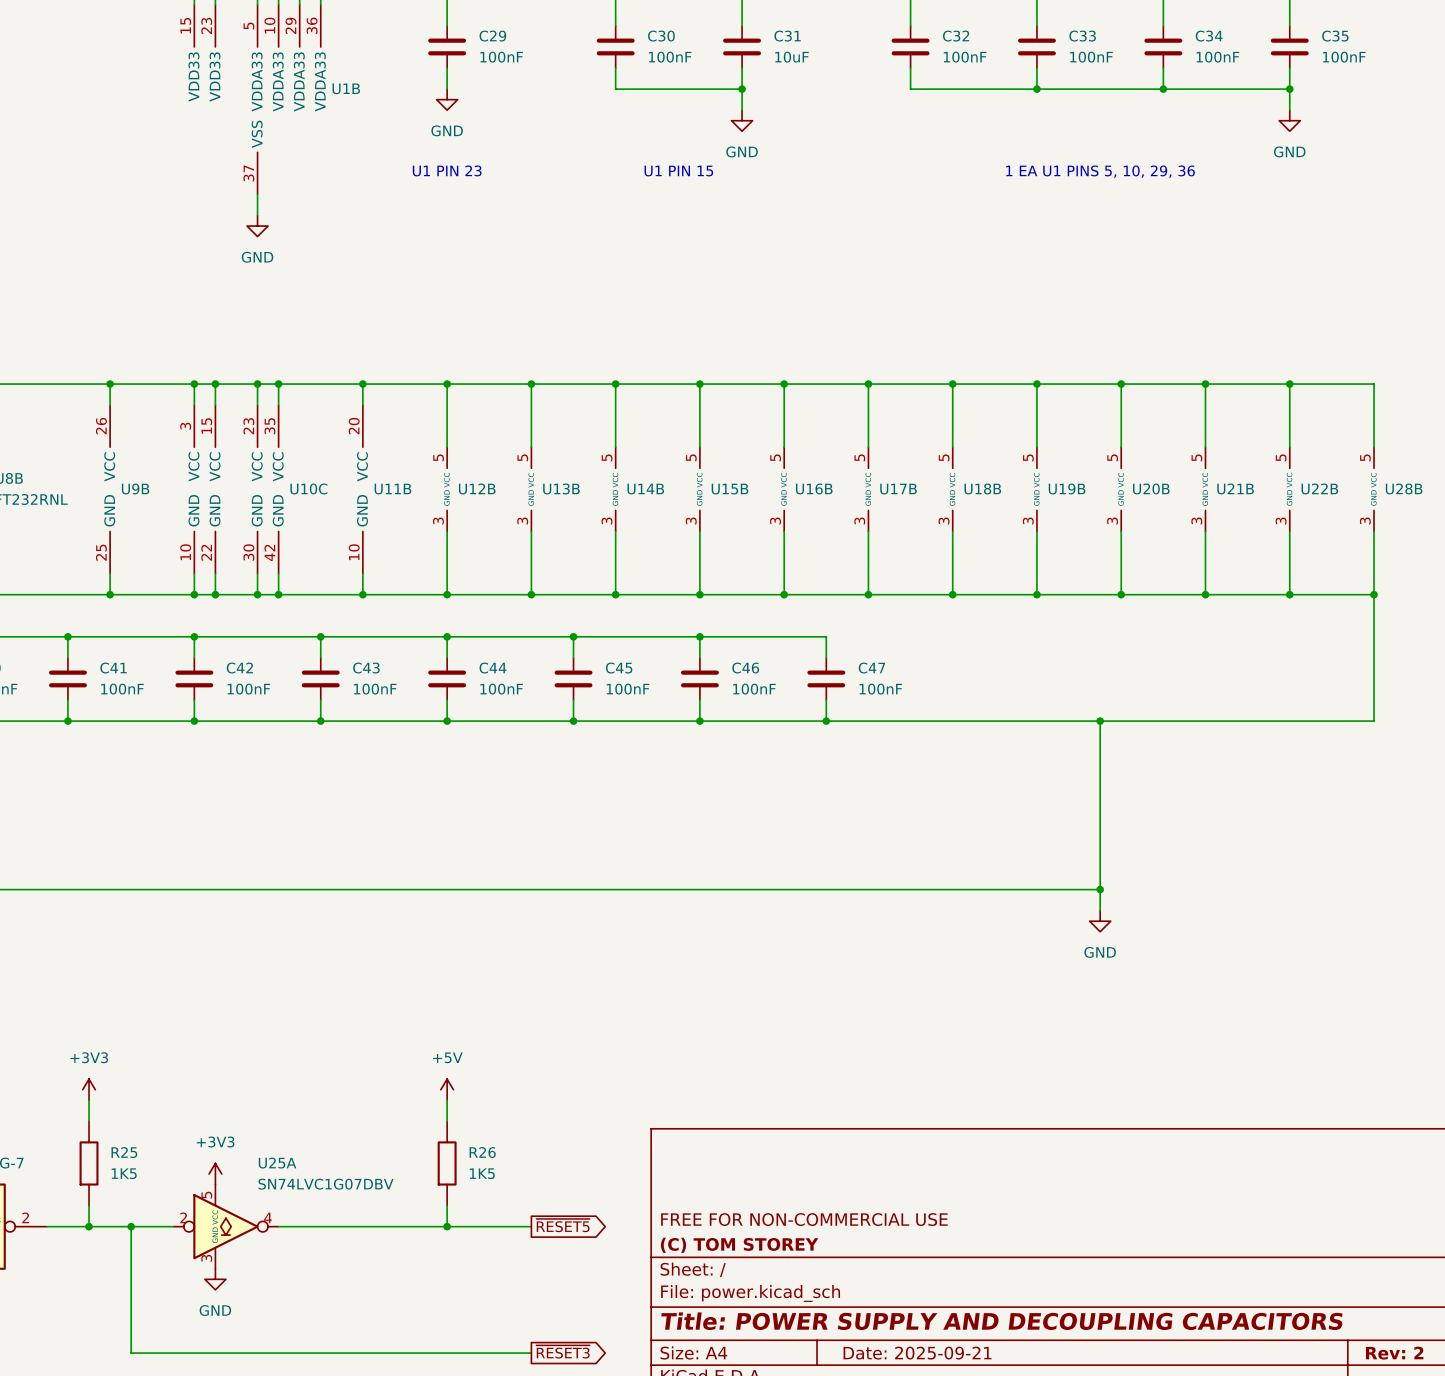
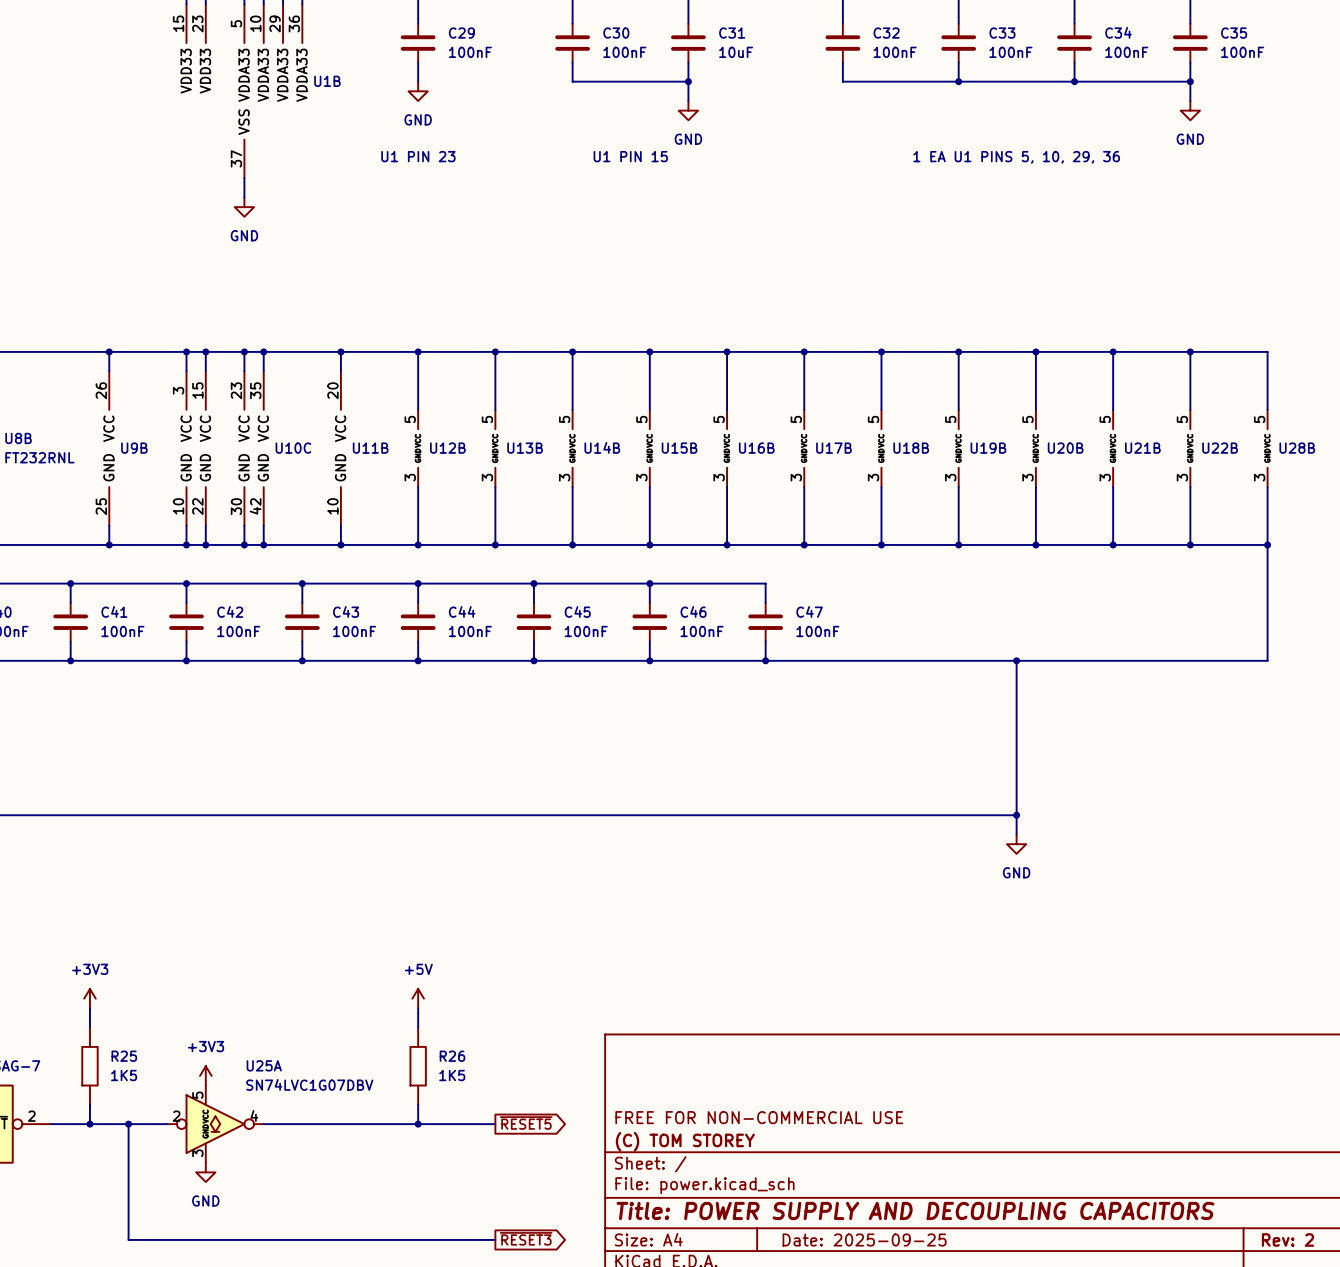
title block: Date: 2025-09-21 (917, 1353) -> Date: 2025-09-25 (864, 1239)

